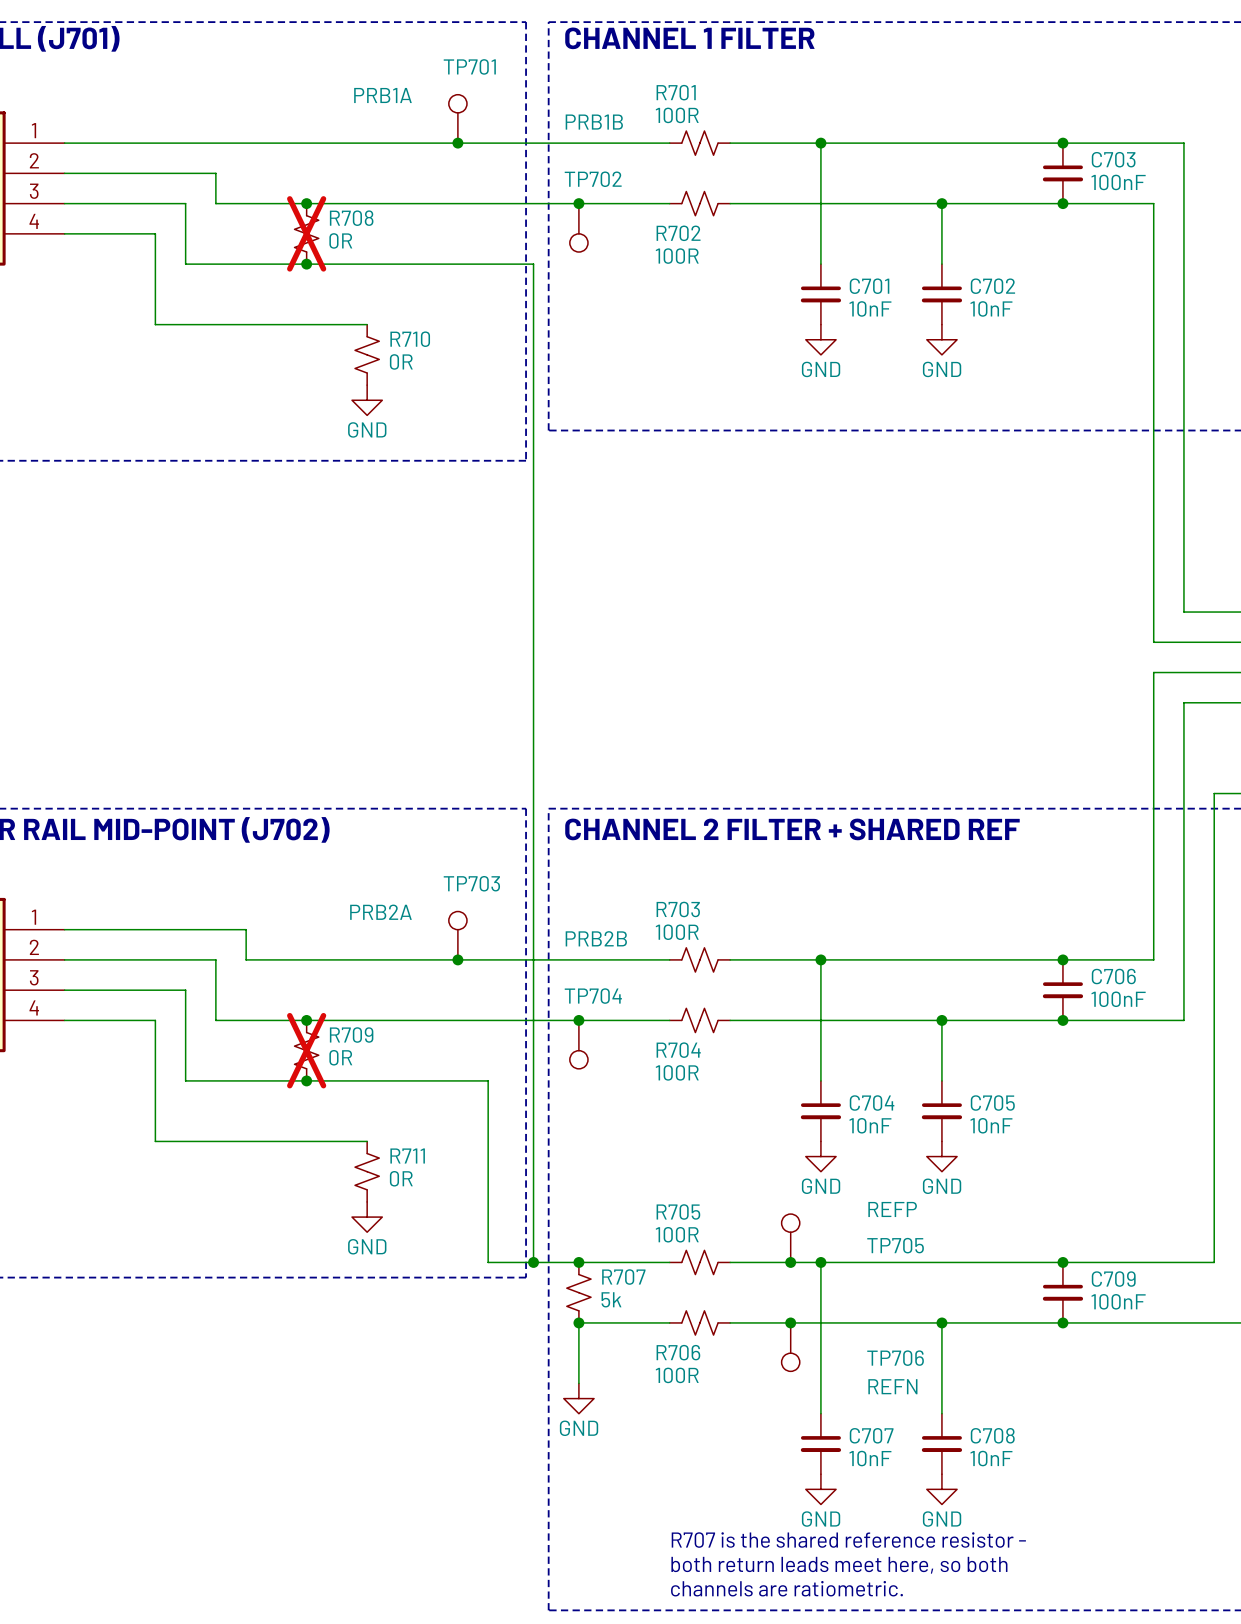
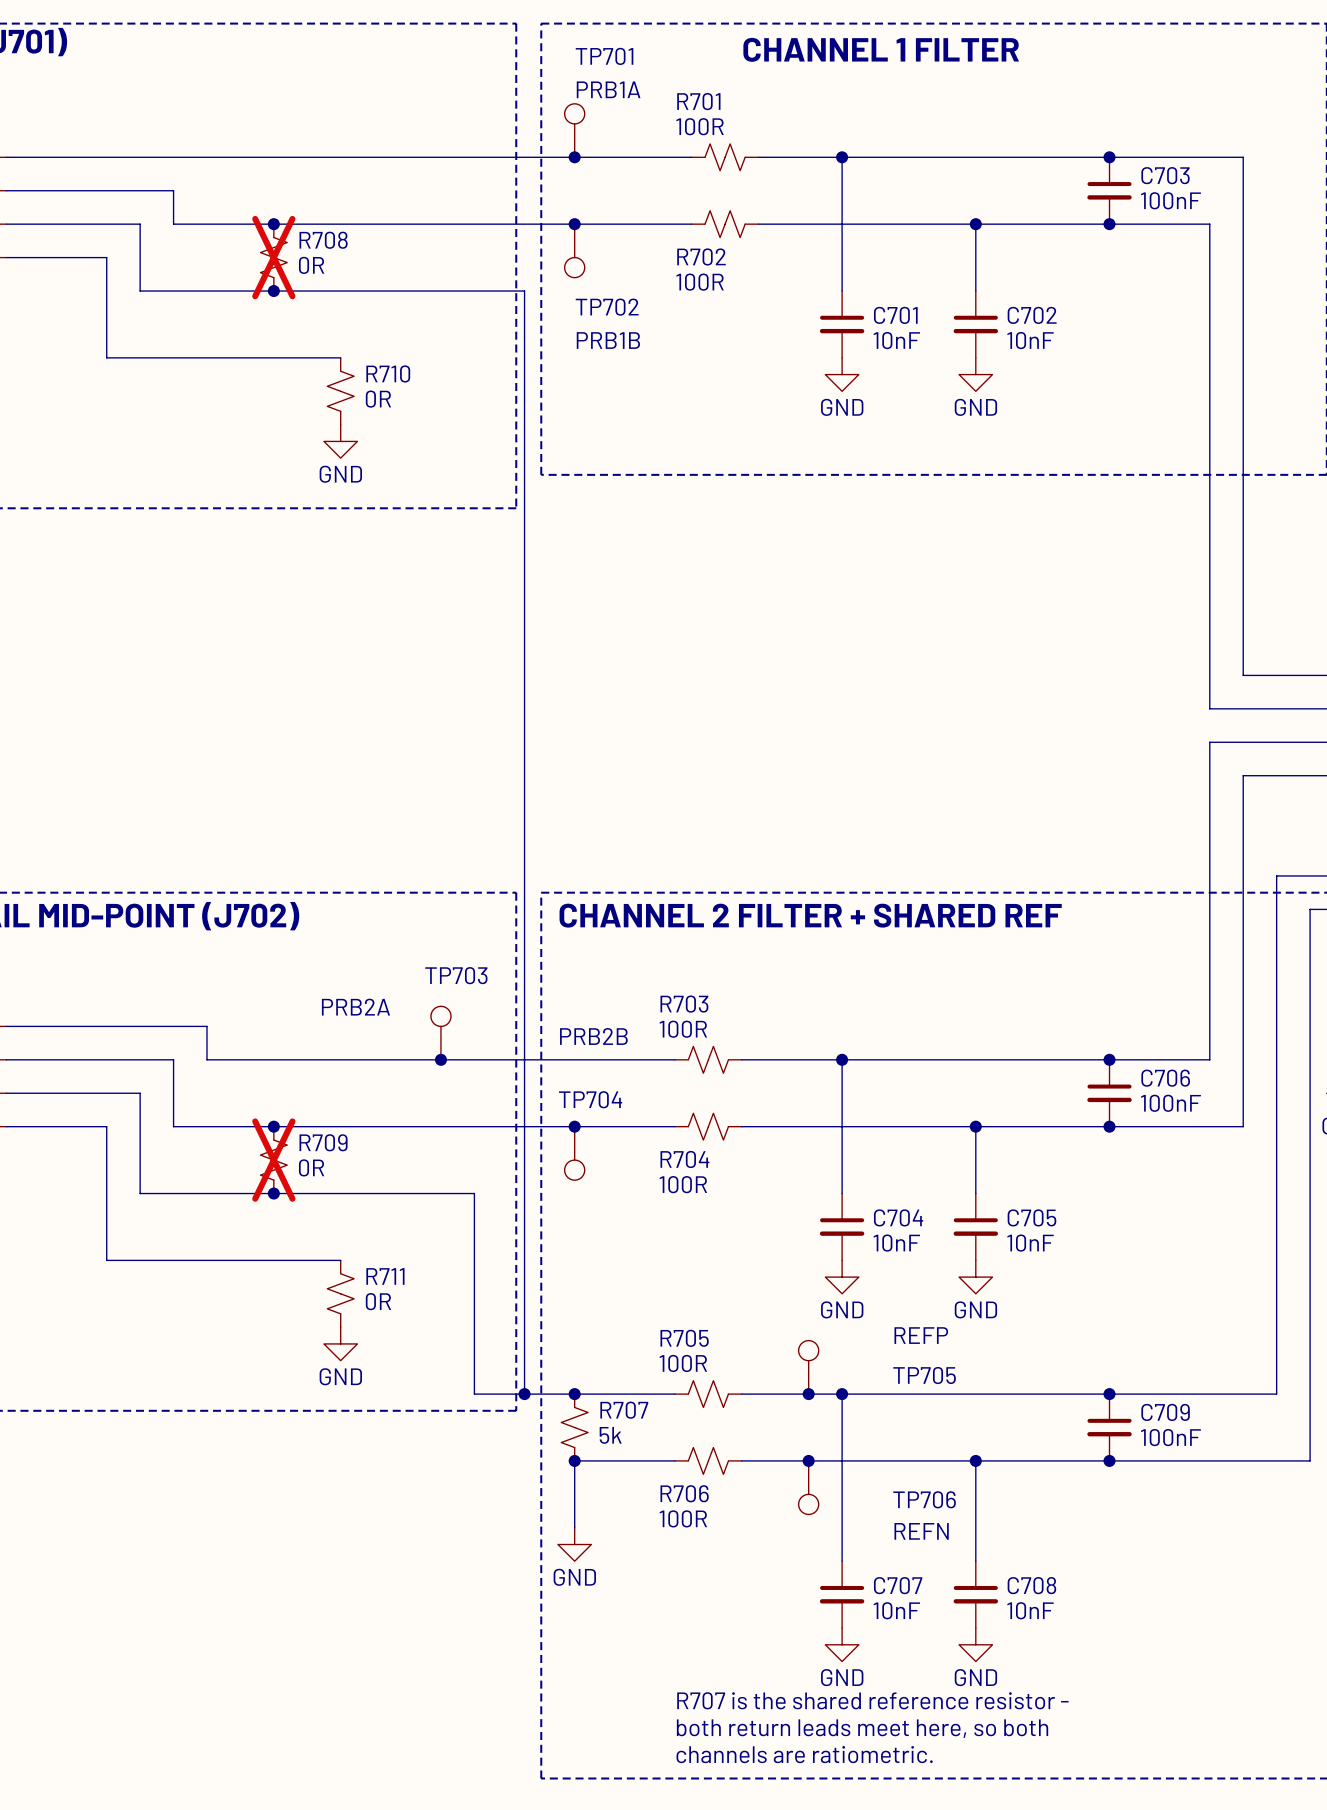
text position: CHANNEL 1 FILTER (689, 38) -> CHANNEL 1 FILTER (881, 49)
TP701 name position: TP701 (469, 66) -> TP701 (604, 56)
TP701 value position: PRB1A (382, 95) -> PRB1A (608, 89)
TP701 position: (457, 118) -> (574, 130)
TP702 value position: PRB1B (594, 122) -> PRB1B (608, 340)
junction: (457, 143) -> none
junction: none -> (574, 157)
R701 position: (699, 143) -> (725, 157)
TP702 name position: TP702 (593, 179) -> TP702 (607, 307)
R702 position: (699, 203) -> (725, 224)

